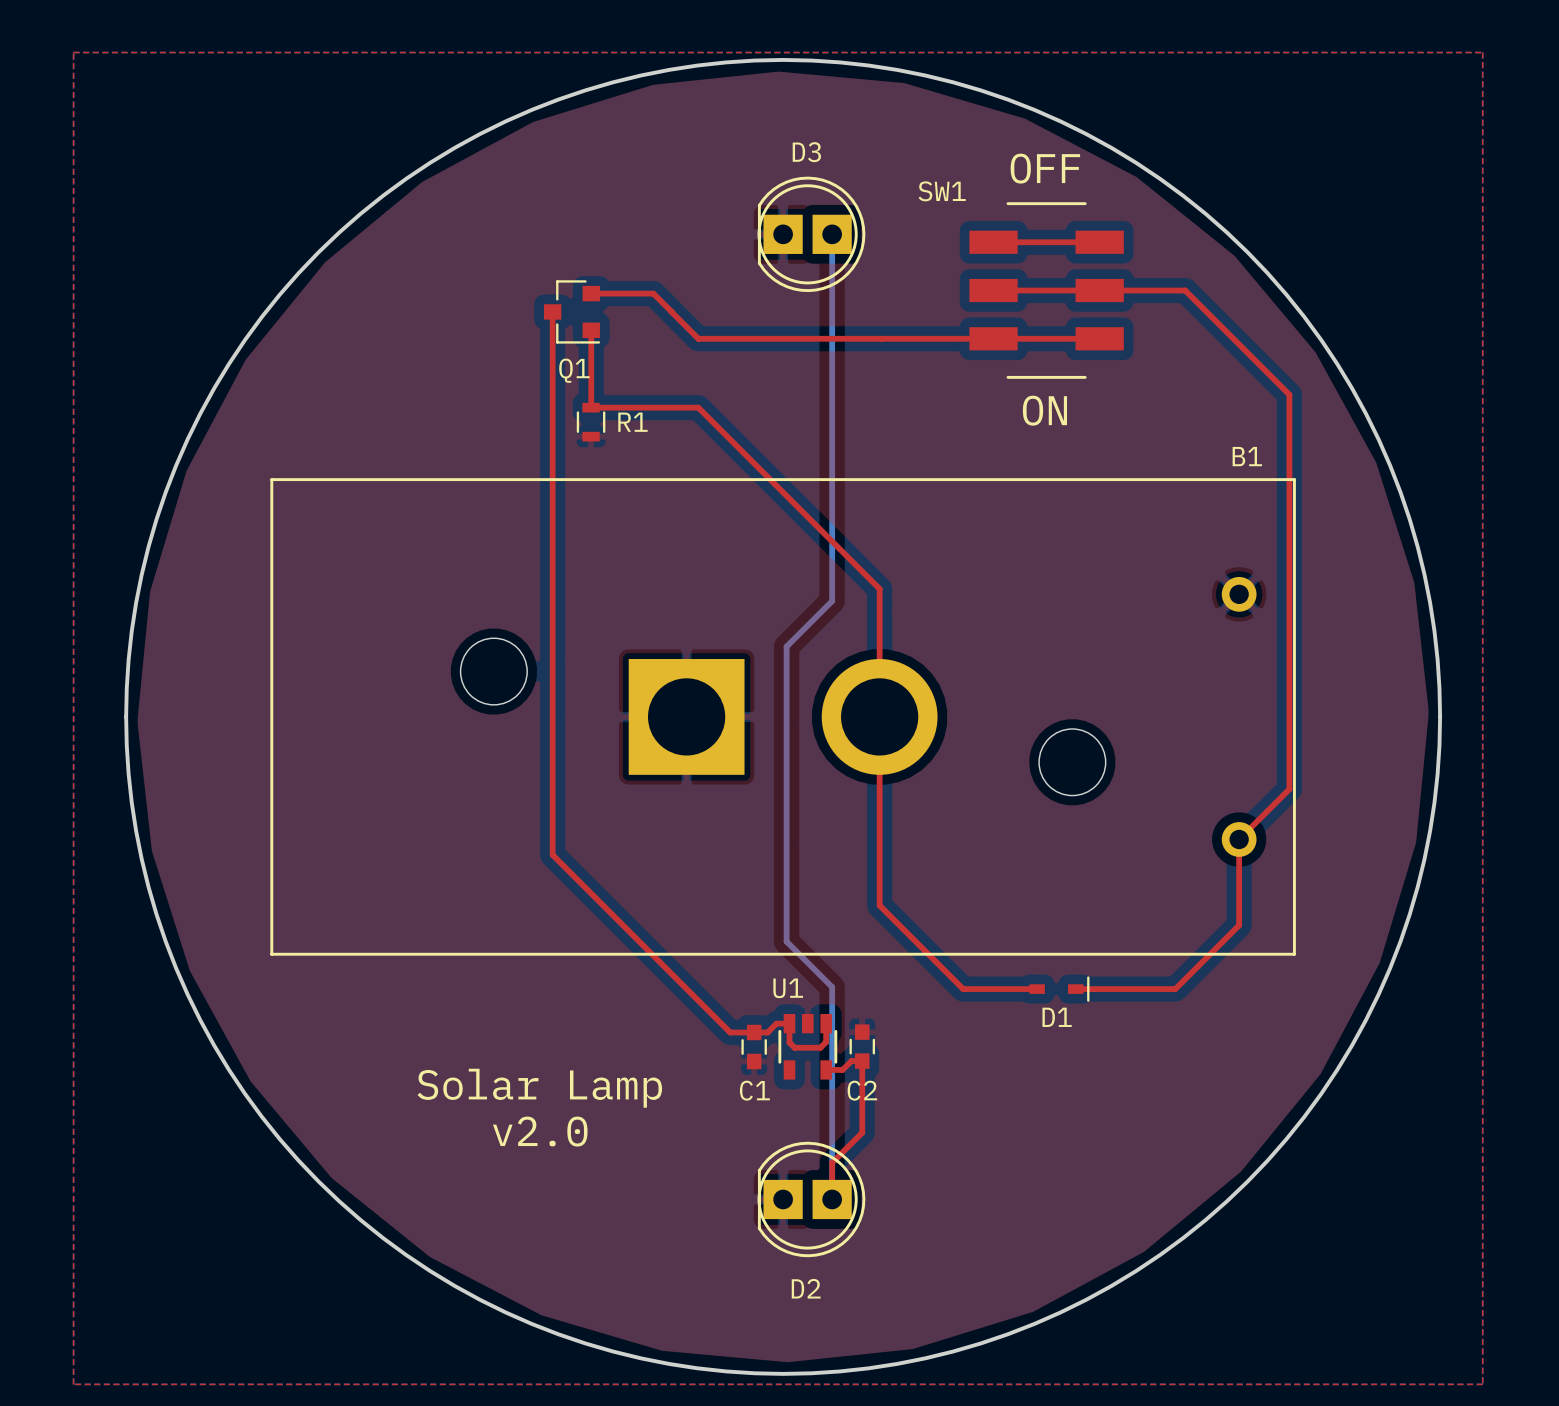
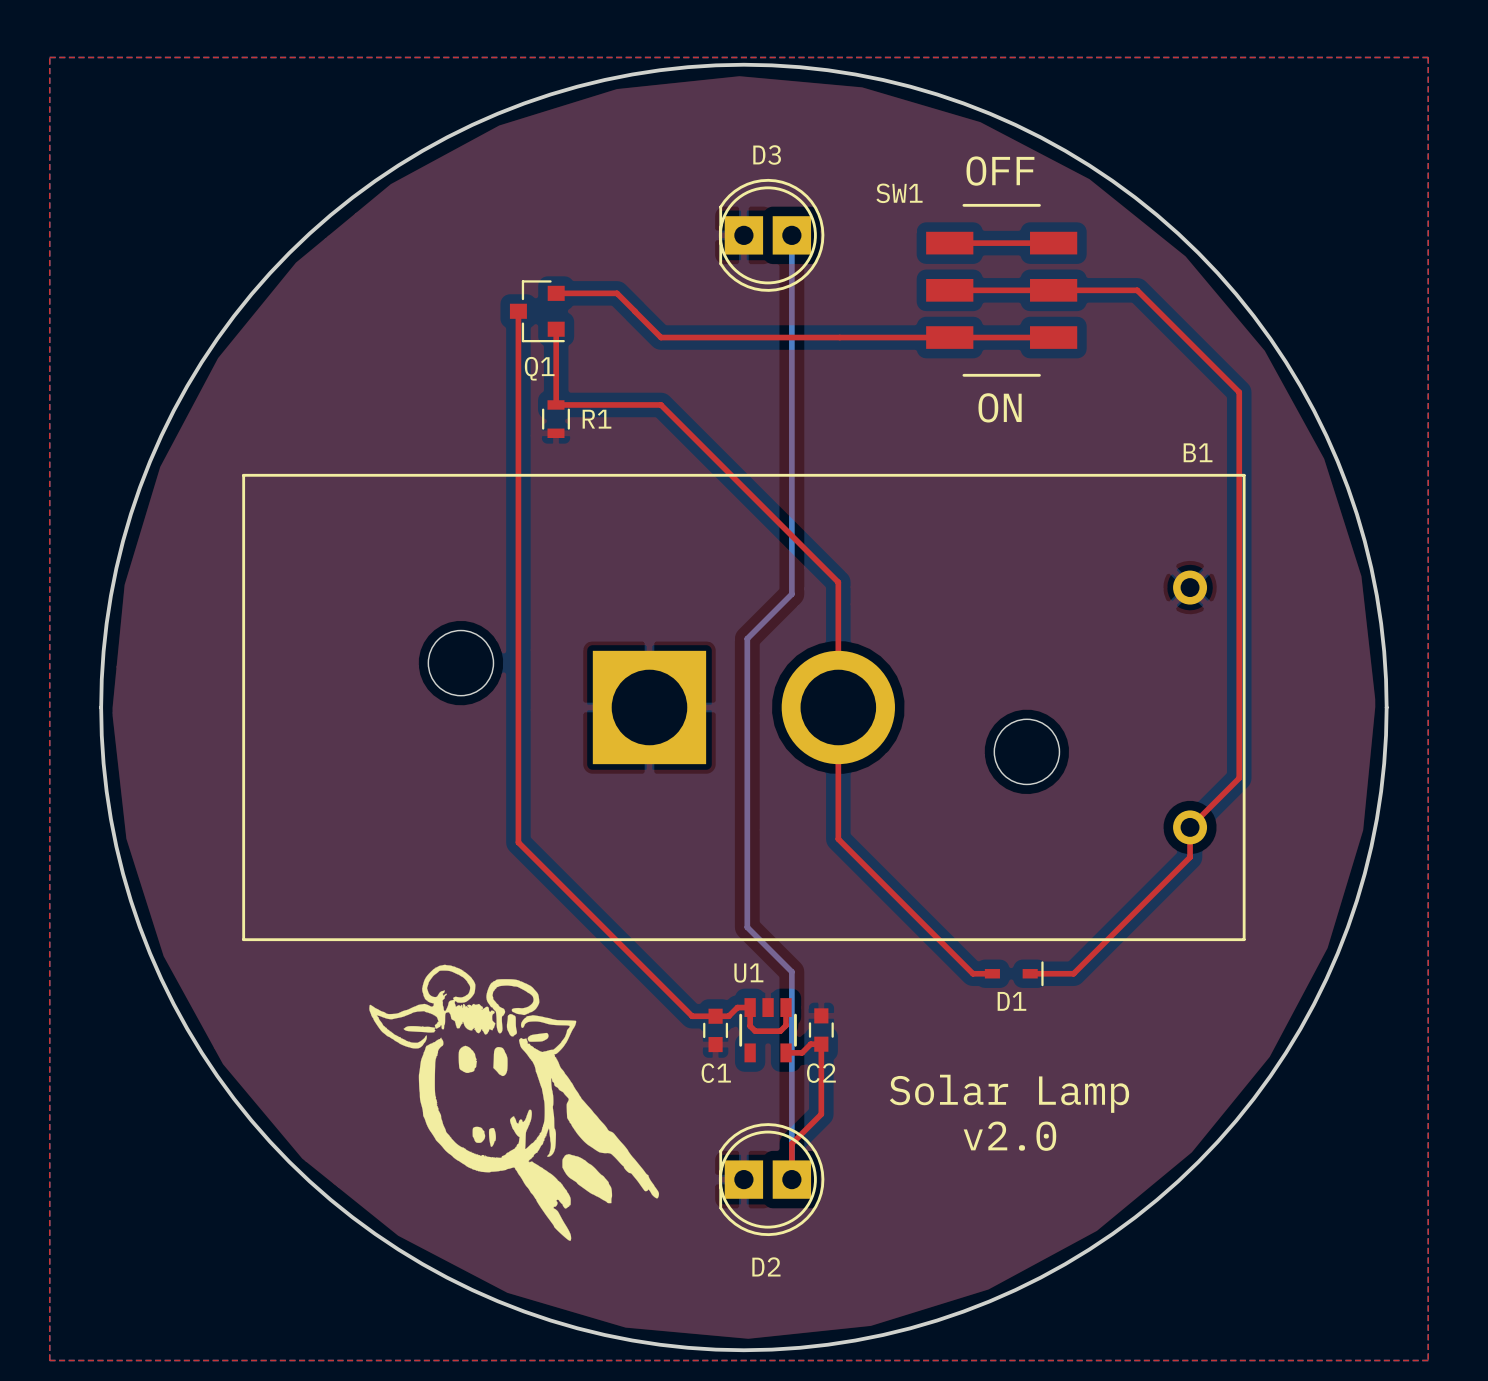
top track: (879, 851) (879, 905) (963, 989) (1017, 989) -> (838, 839) (972, 973)
top track: (1239, 870) (1239, 925) (1175, 989) (1120, 989) -> (1190, 857) (1073, 973)
drawing: none -> [369, 964, 660, 1241]
text: Solar Lamp (539, 1088) -> none
text: none -> Solar Lamp (1009, 1093)
text: v2.0 (540, 1131) -> none
text: none -> v2.0 (1009, 1136)

